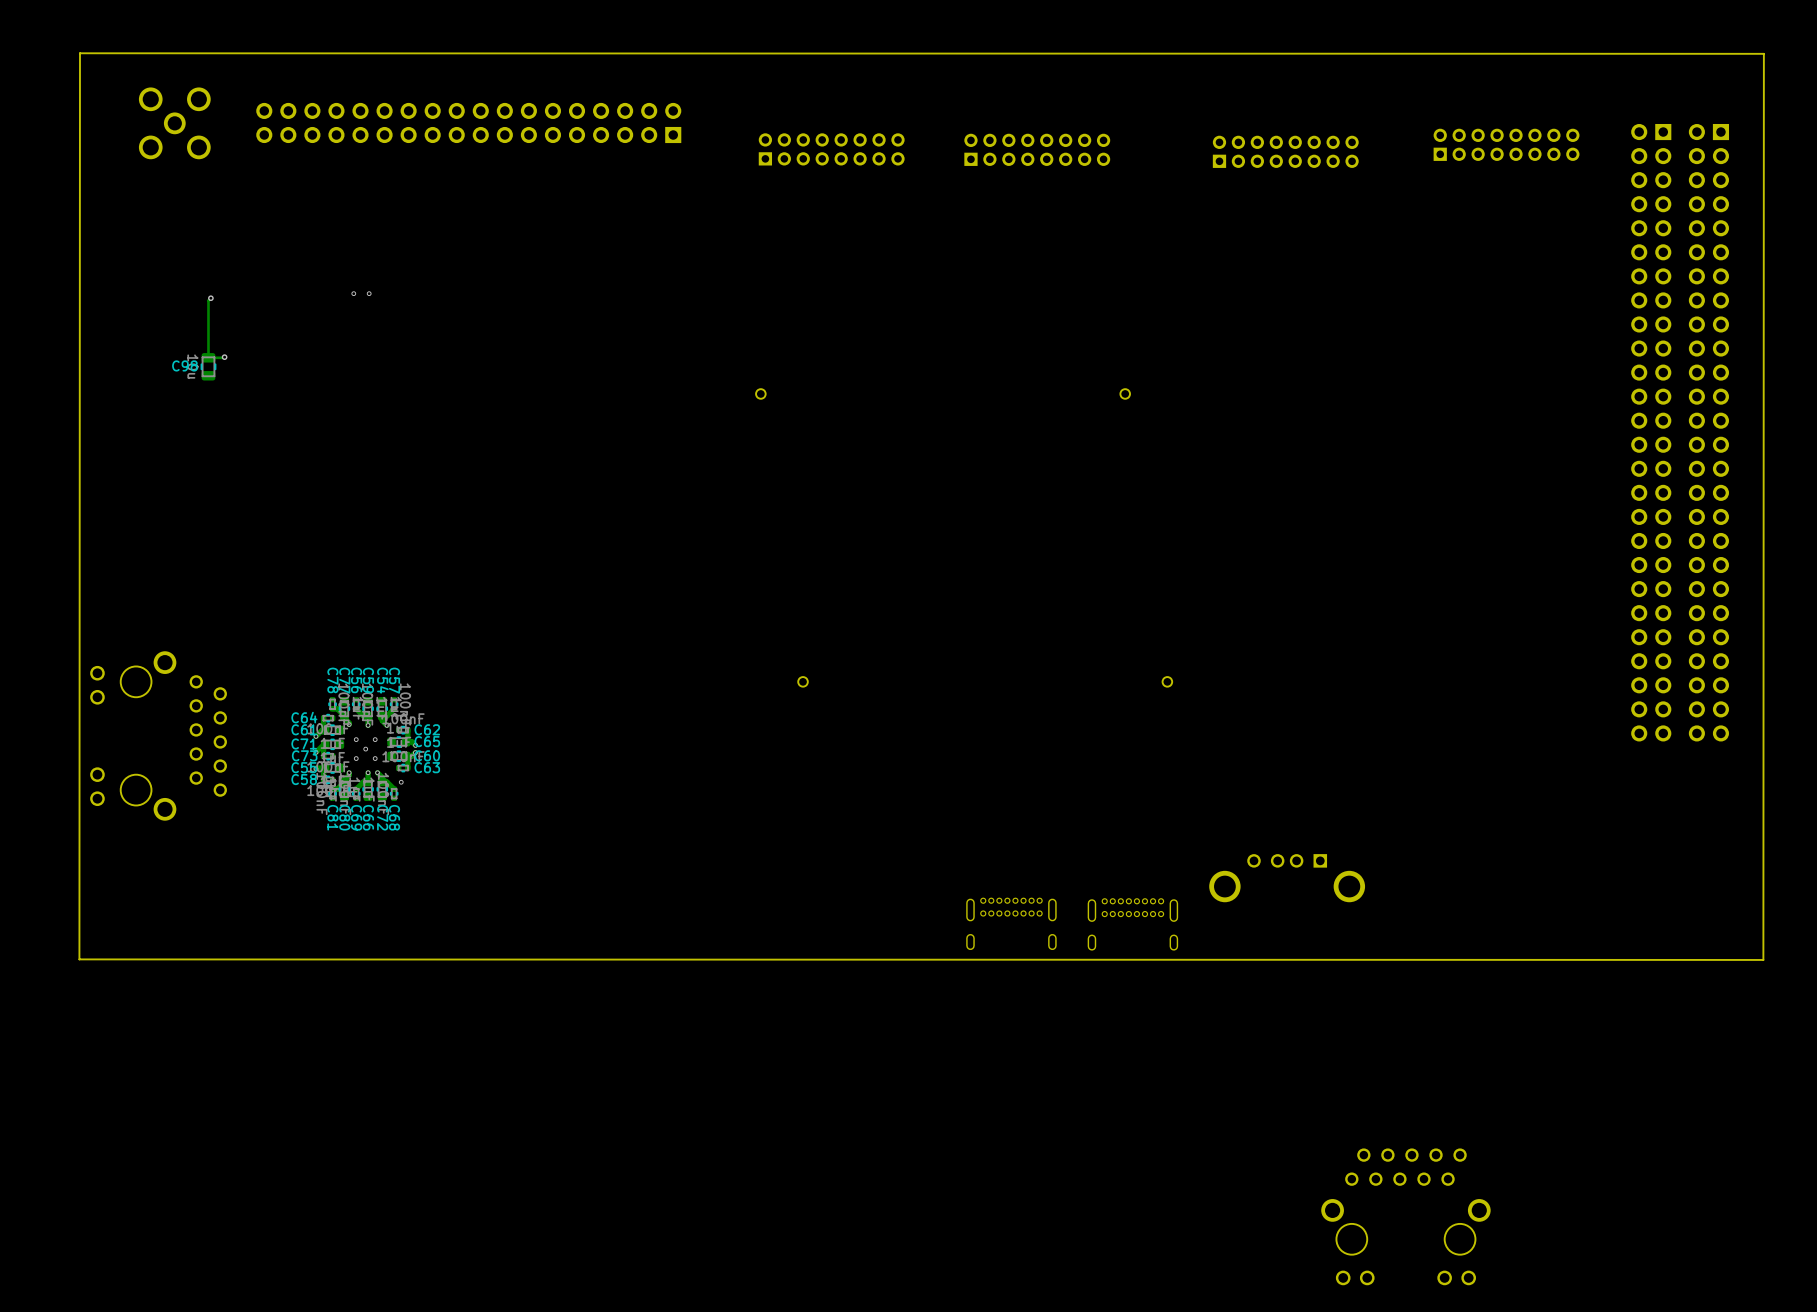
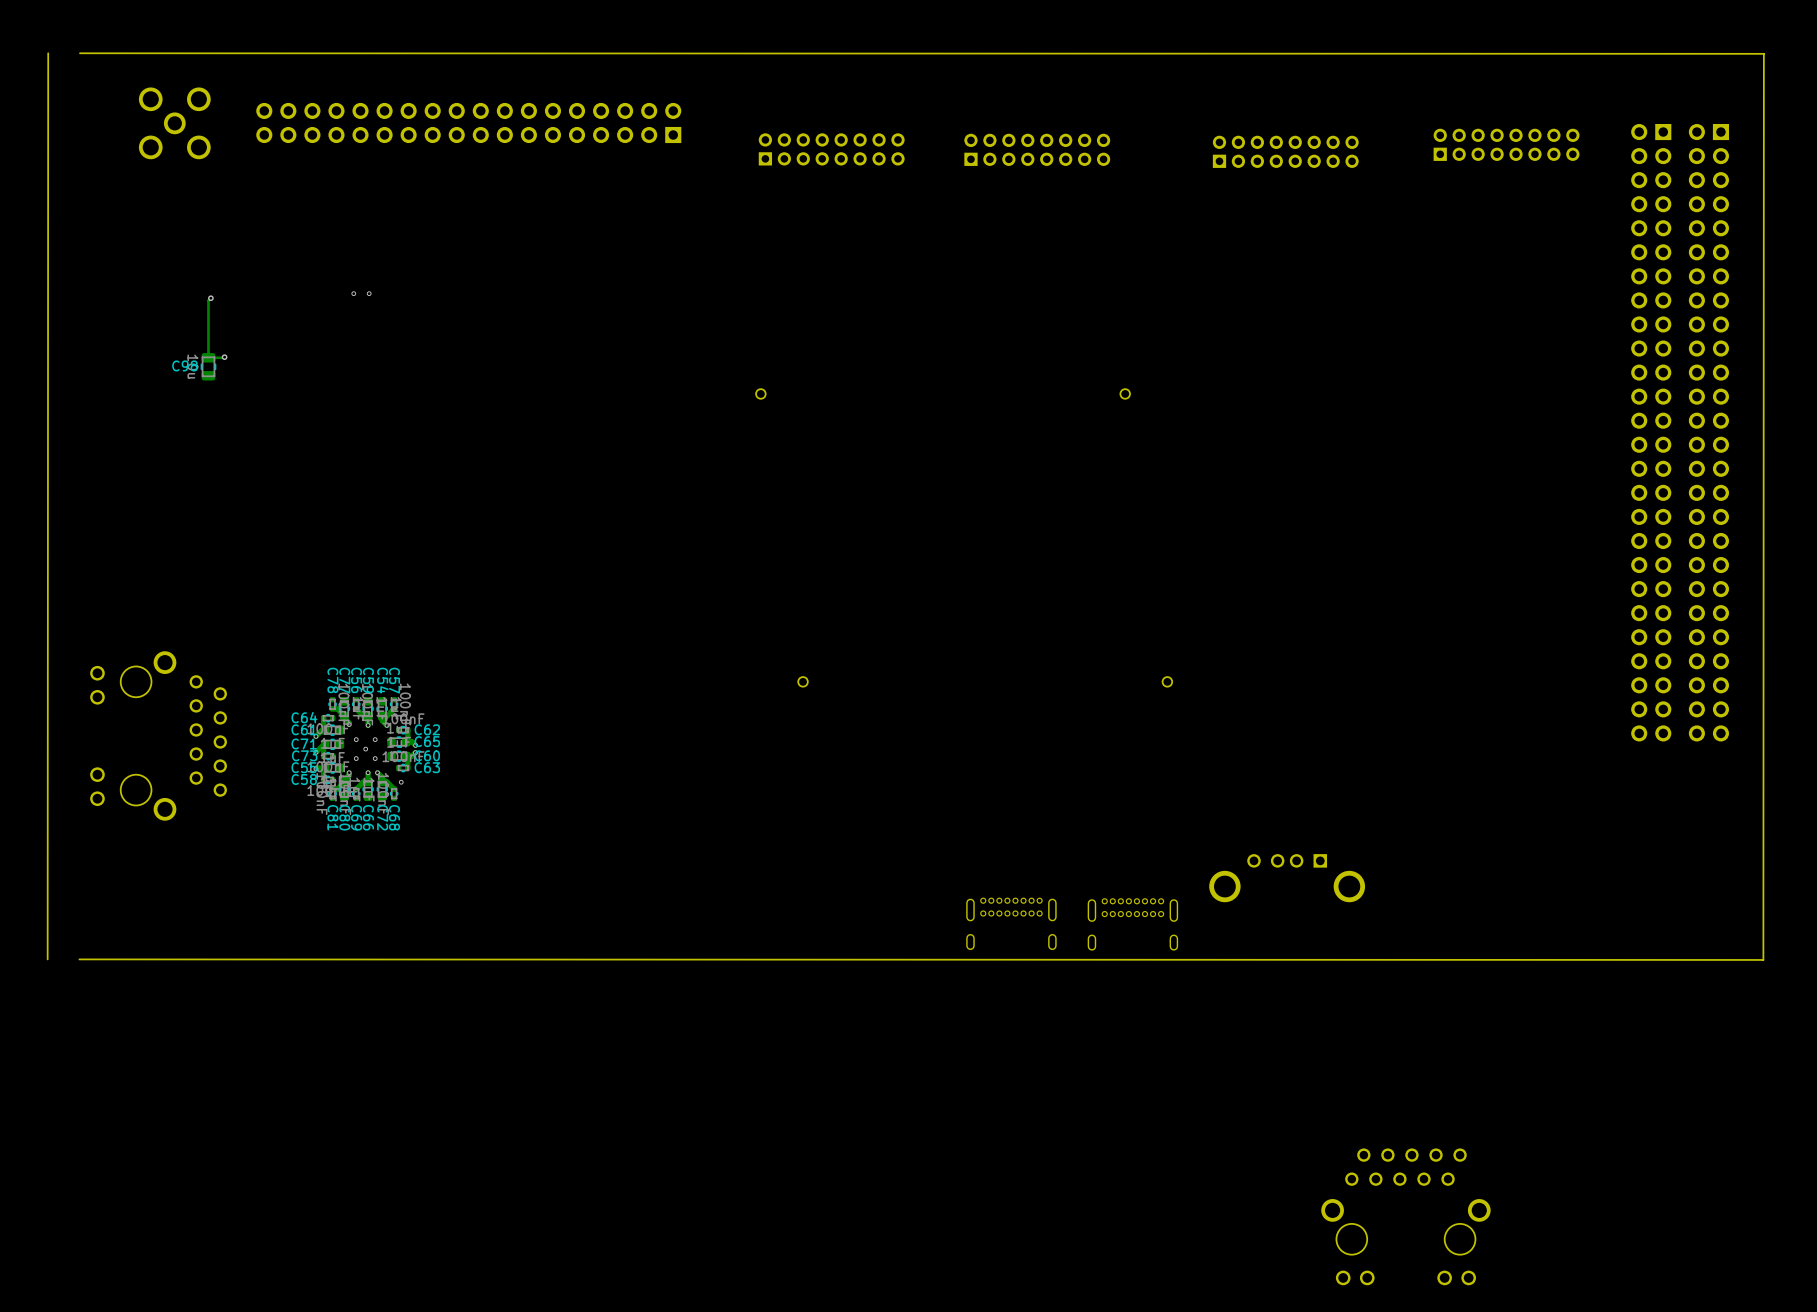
board edge: (79, 53) (79, 959) -> (48, 53) (47, 959)

